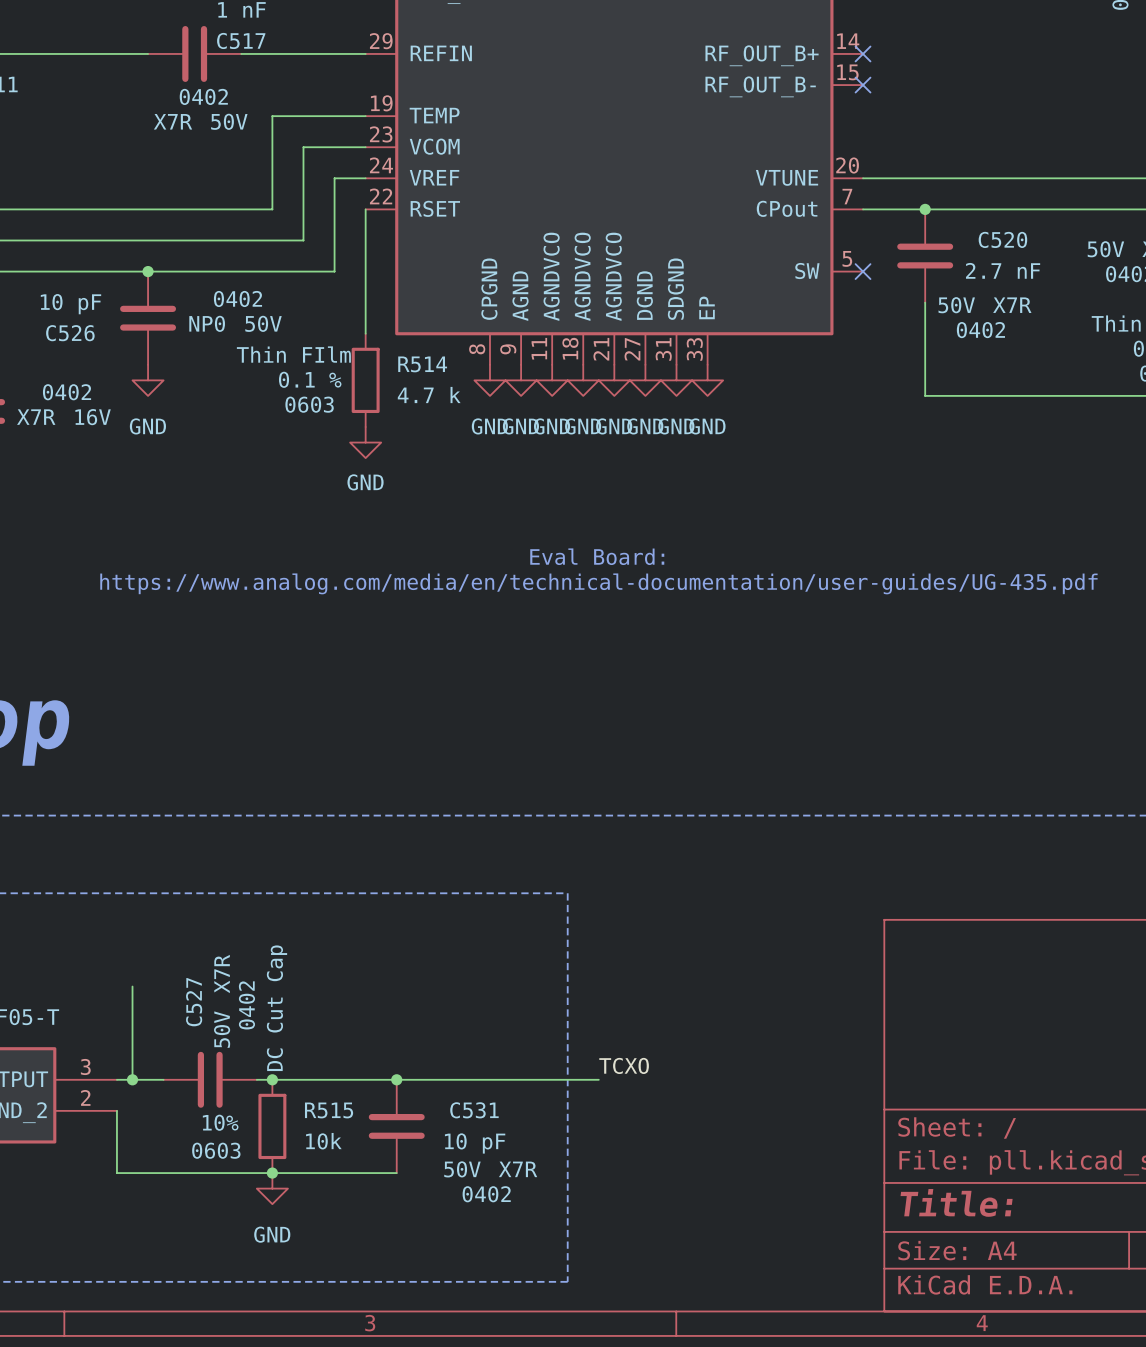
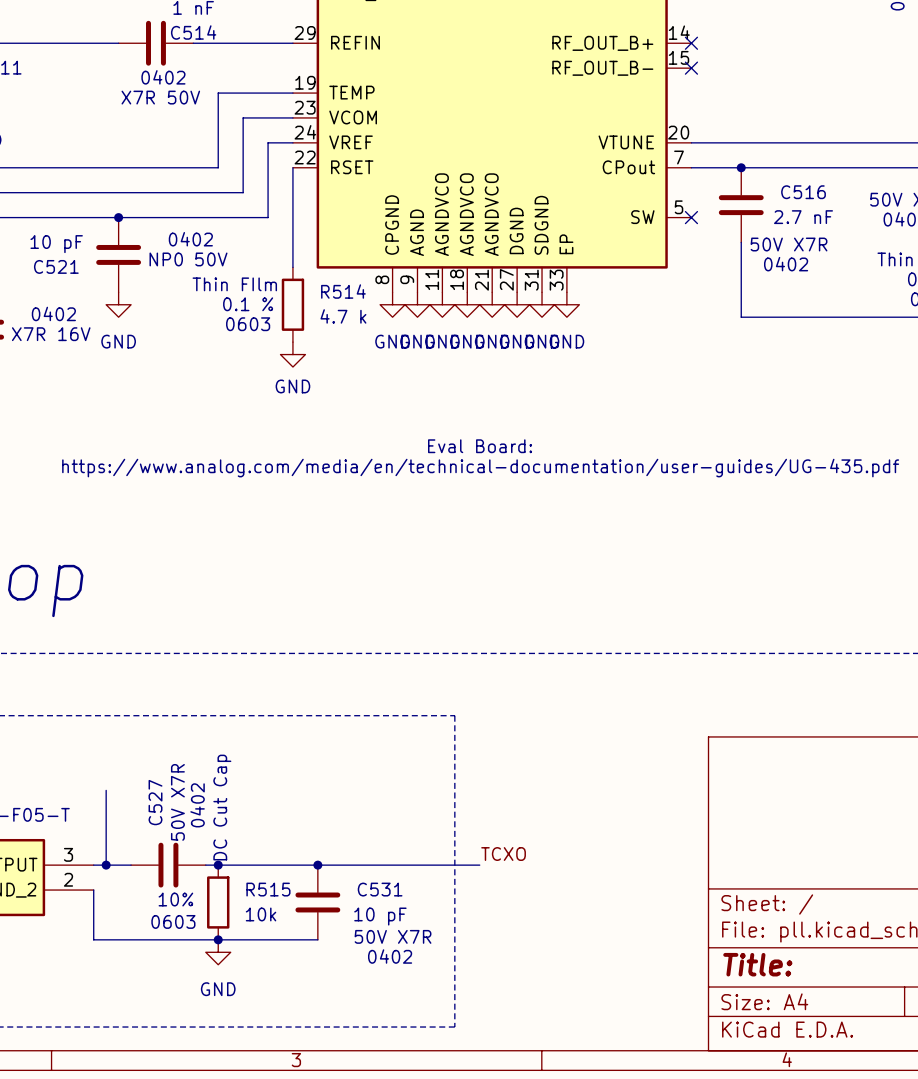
C517 name: C517 (241, 40) -> C514 (193, 32)
C520 name: C520 (1002, 239) -> C516 (803, 192)
C526 name: C526 (70, 333) -> C521 (56, 266)

